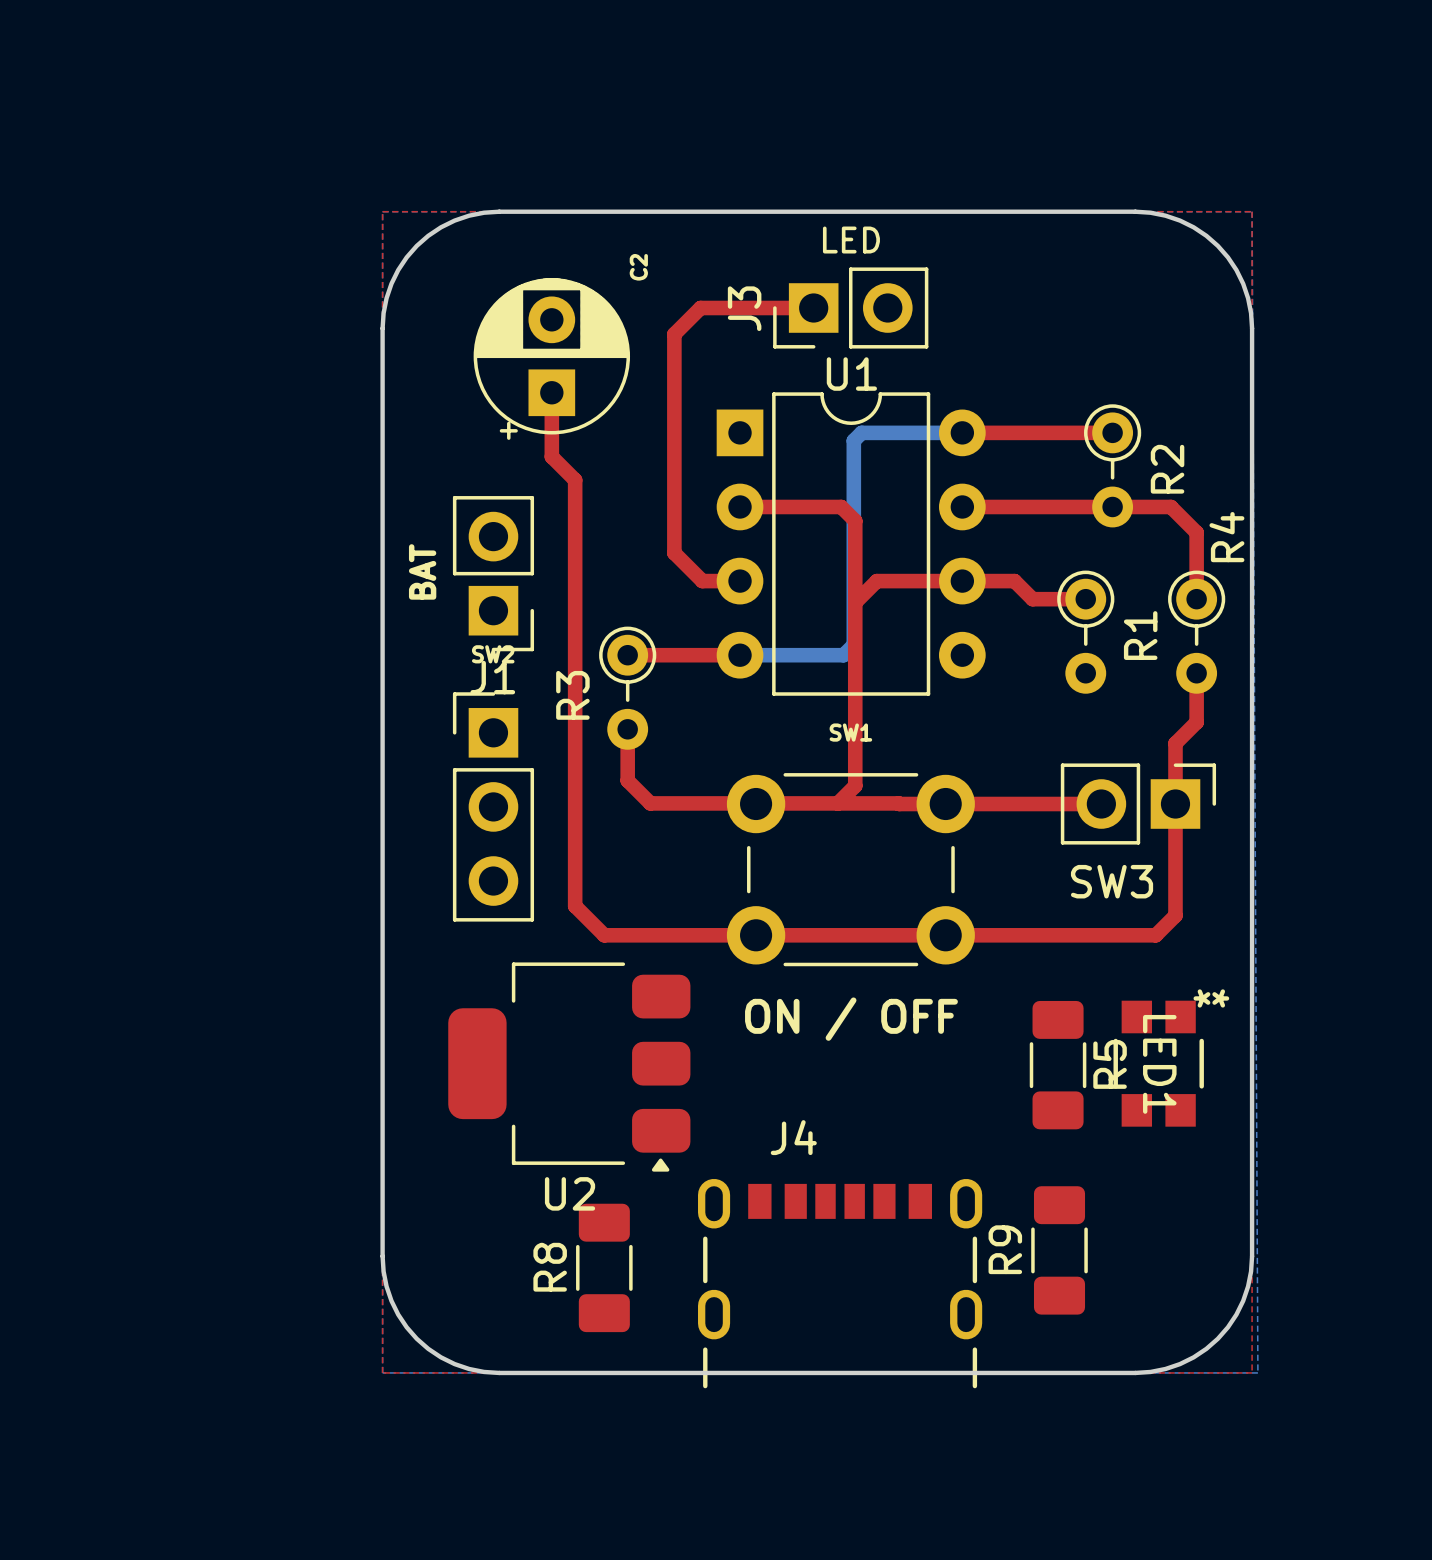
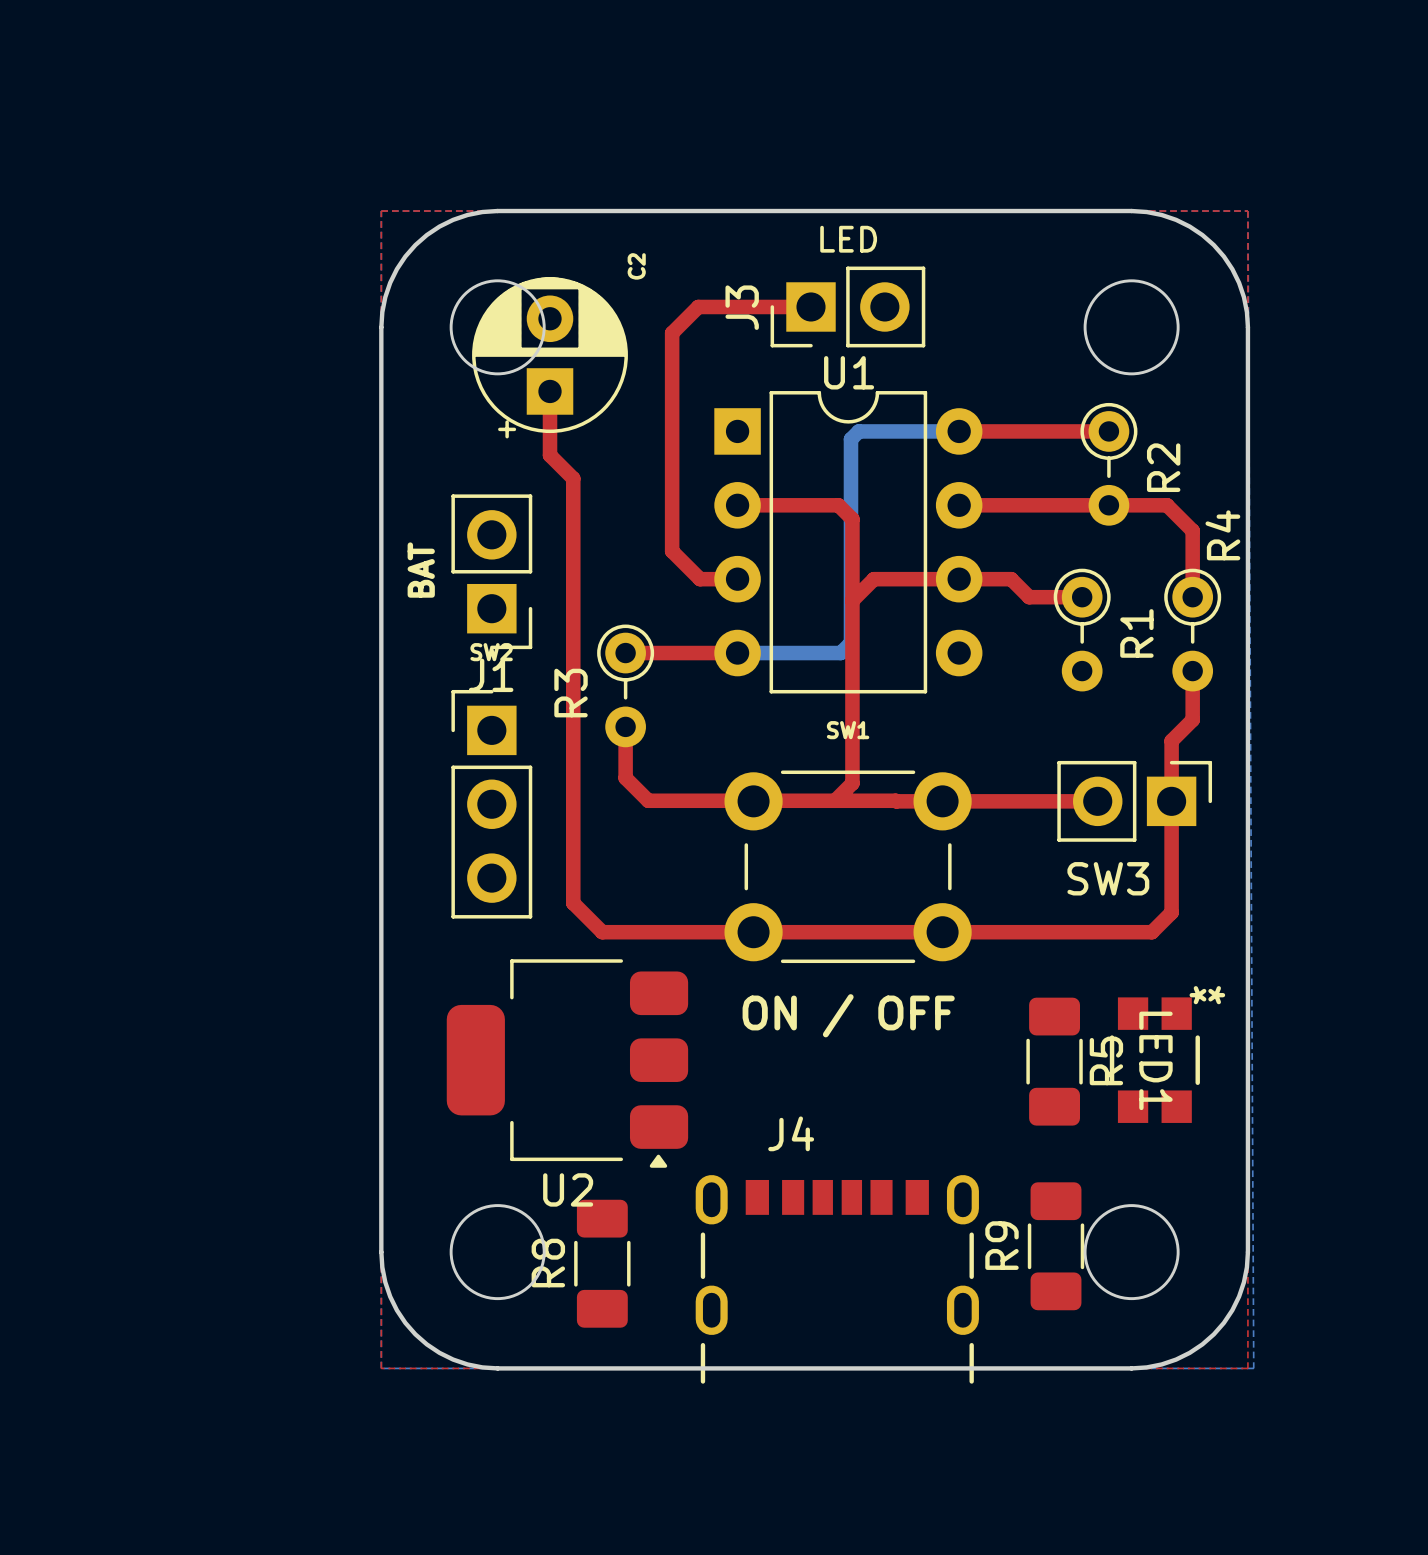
round board edge: none -> [449, 279, 546, 376]
round board edge: none -> [1083, 279, 1180, 376]
round board edge: none -> [449, 1204, 546, 1301]
round board edge: none -> [1083, 1204, 1180, 1301]

